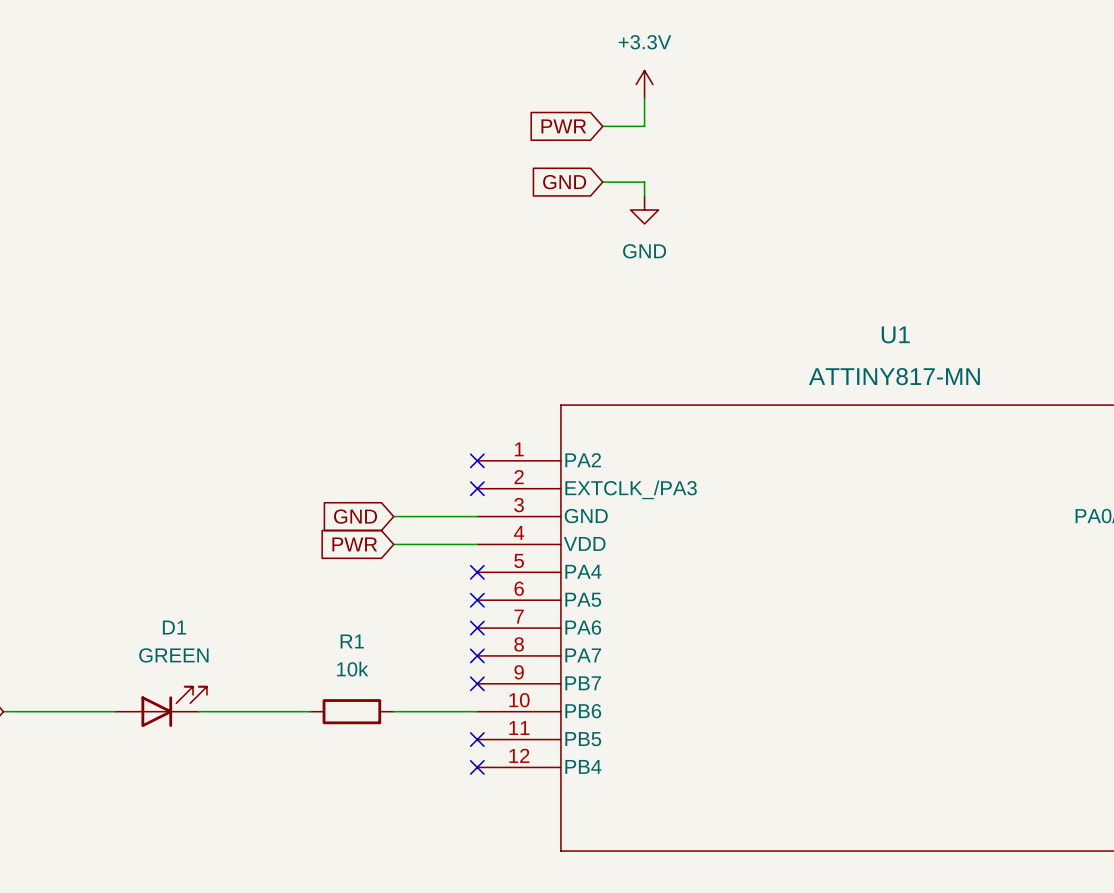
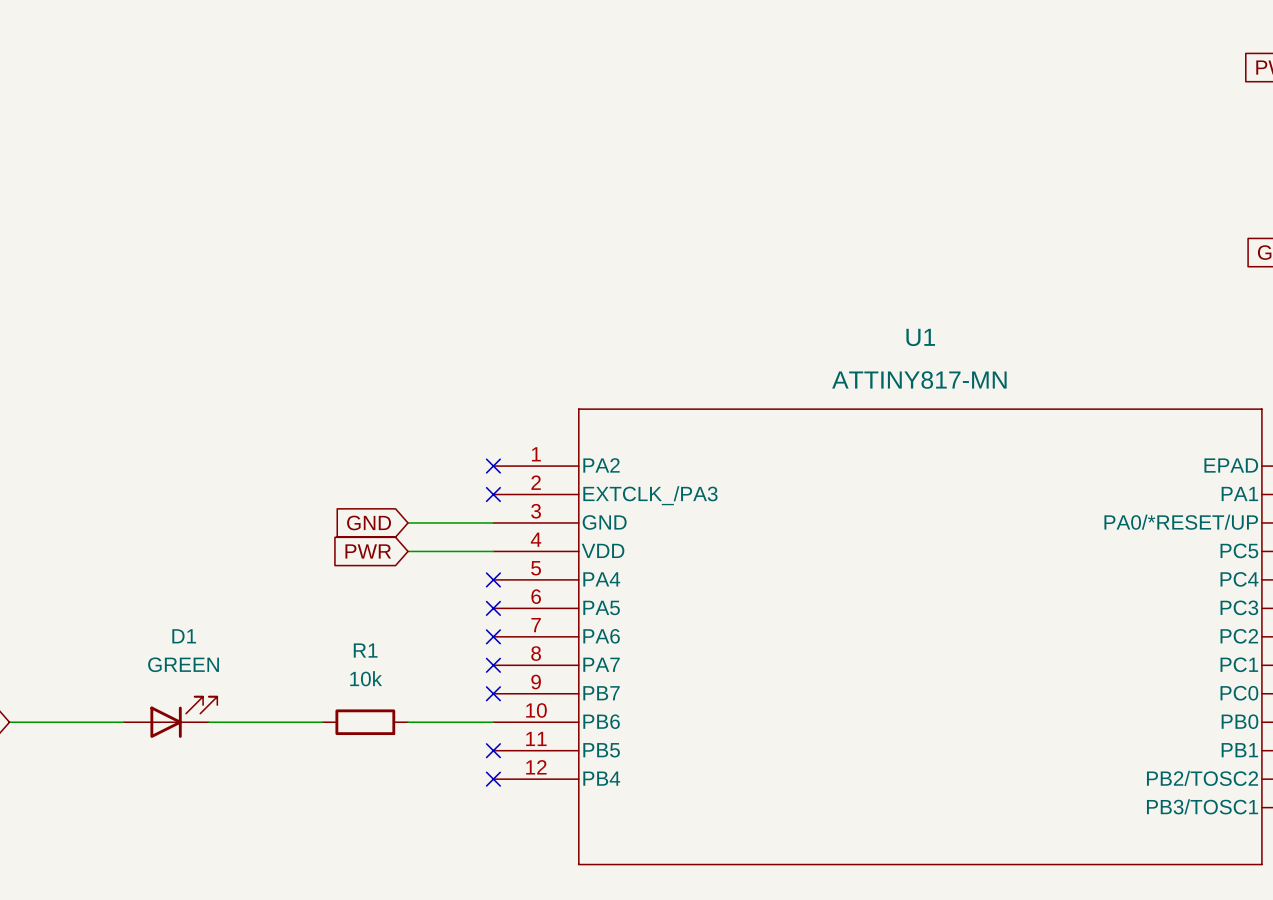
power symbol: +3.3V (644, 84) -> none
wire: (644, 98) (644, 126) (602, 126) -> none
global label: PWR (563, 126) -> none
global label: GND (564, 182) -> none
wire: (602, 182) (644, 182) (644, 196) -> none
power symbol: GND (644, 209) -> none

